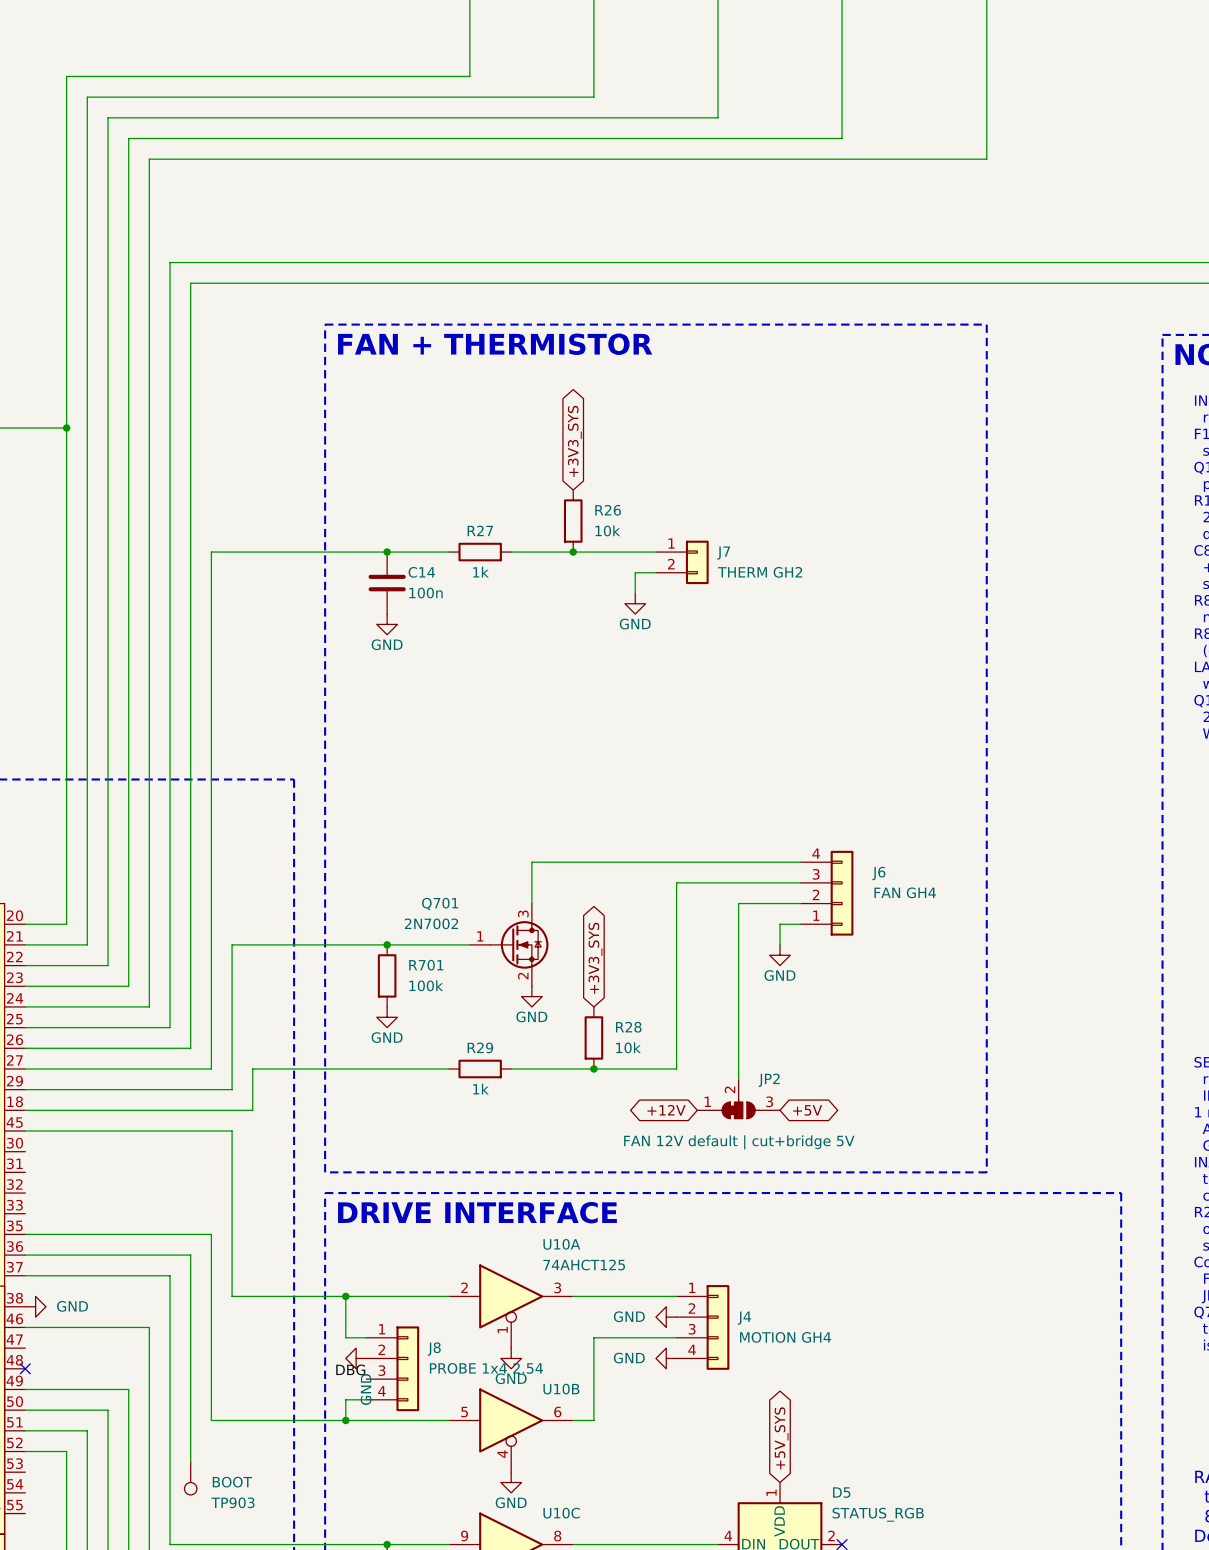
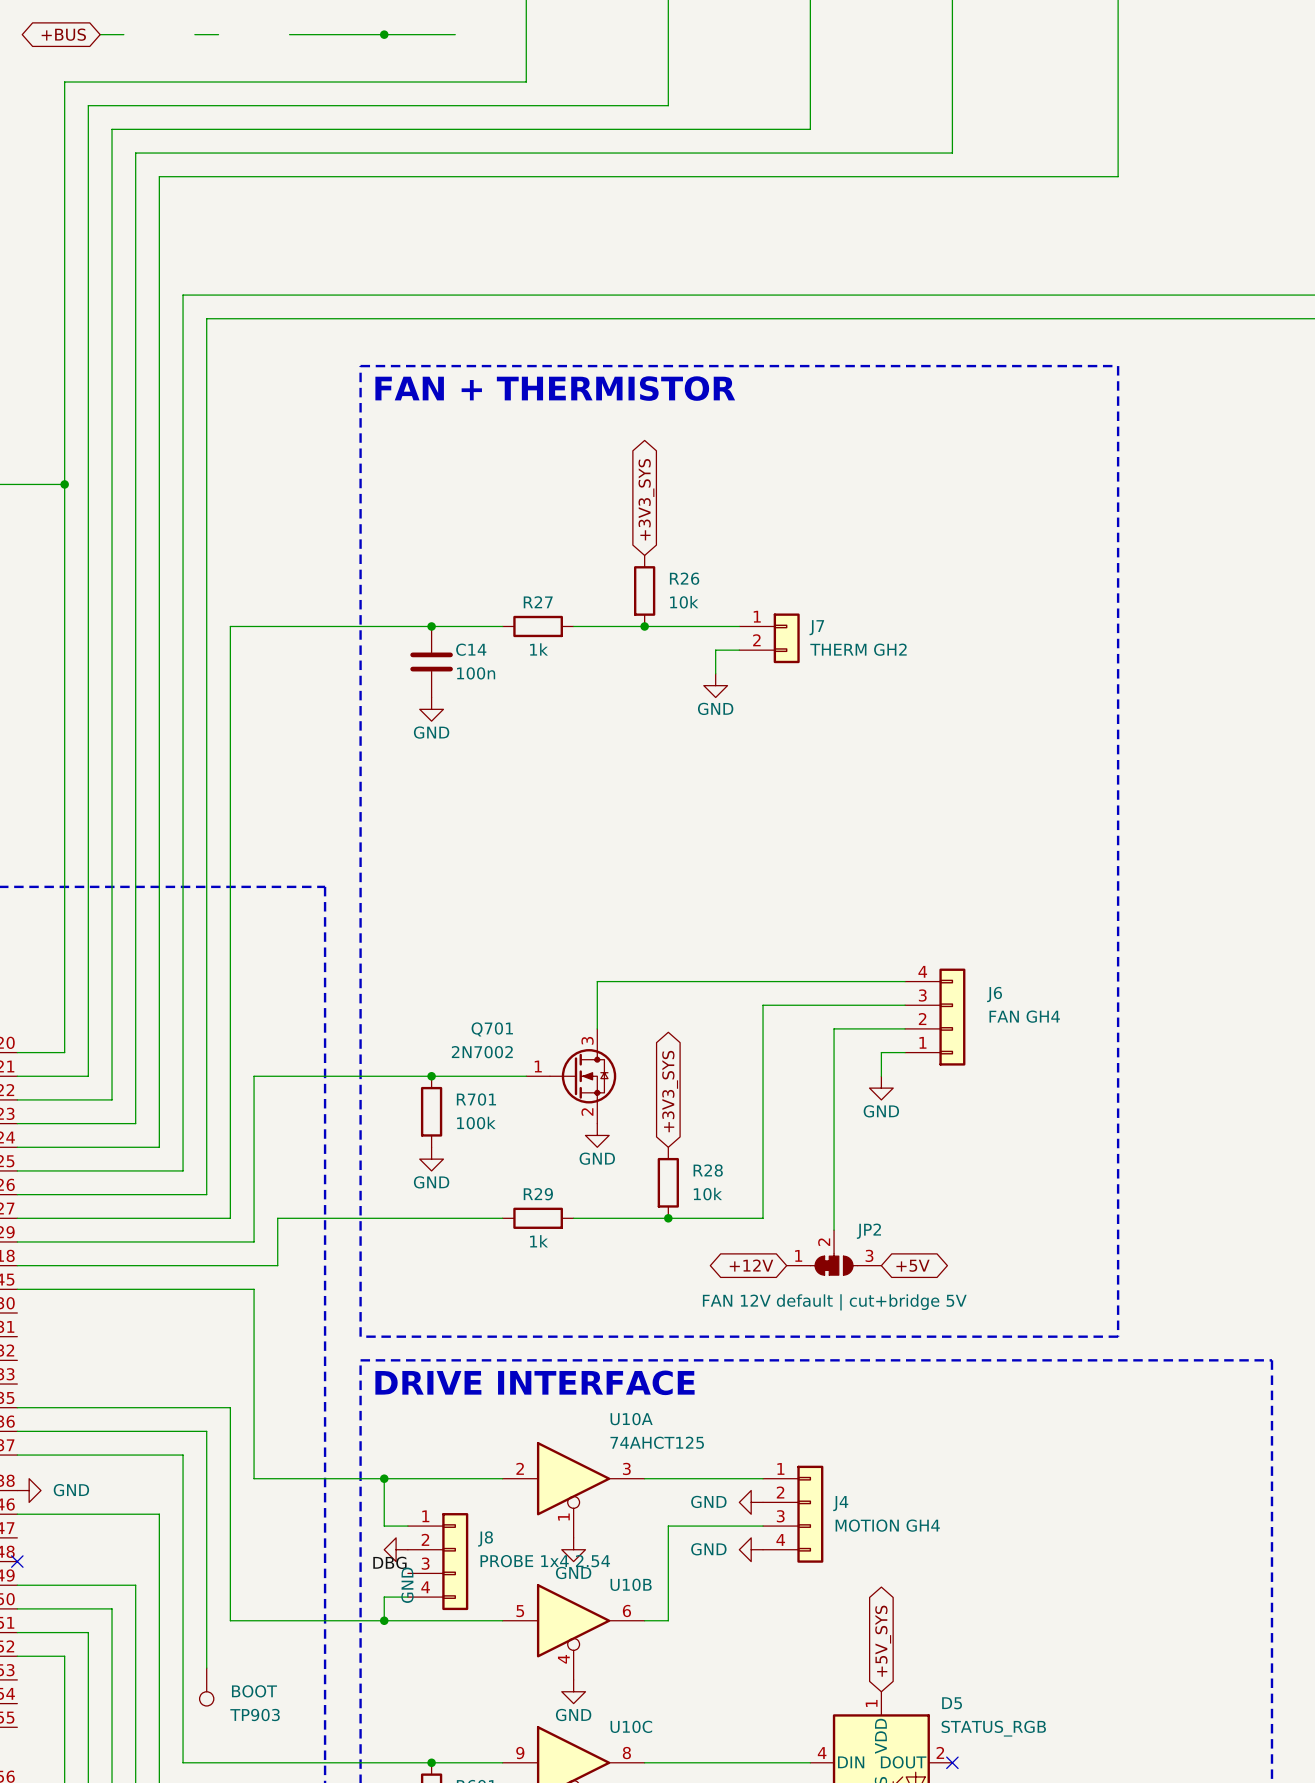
global label: none -> +BUS (63, 34)
wire: none -> (100, 34) (123, 34)
wire: none -> (194, 34) (218, 34)
wire: none -> (289, 34) (455, 34)
junction: none -> (384, 34)

